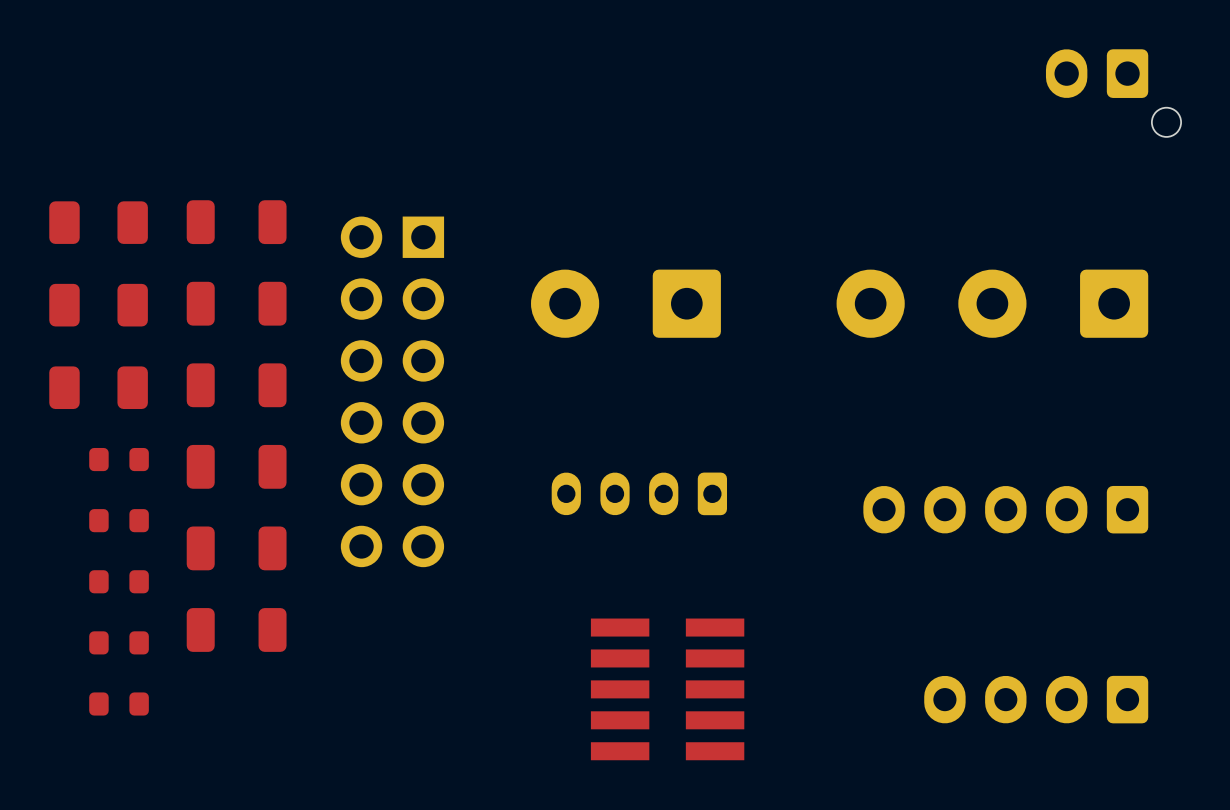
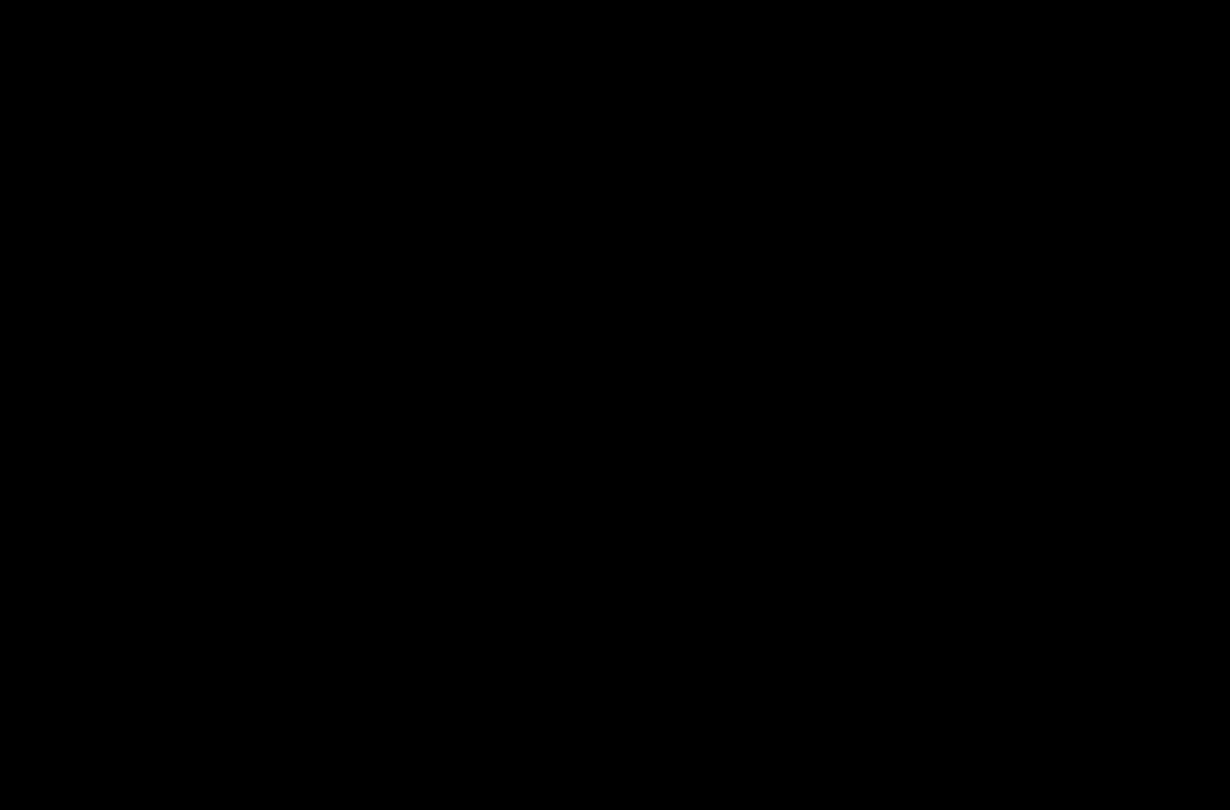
part: (1113, 93) -> none
part: (98, 222) -> none
part: (236, 222) -> none
part: (236, 303) -> none
part: (625, 303) -> none
part: (992, 303) -> none
part: (98, 305) -> none
part: (236, 385) -> none
part: (98, 387) -> none
part: (392, 391) -> none
part: (119, 459) -> none
part: (236, 466) -> none
part: (639, 493) -> none
part: (1005, 509) -> none
part: (119, 520) -> none
part: (236, 548) -> none
part: (119, 581) -> none
part: (236, 629) -> none
part: (119, 642) -> none
part: (667, 689) -> none
part: (1036, 699) -> none
part: (119, 703) -> none

